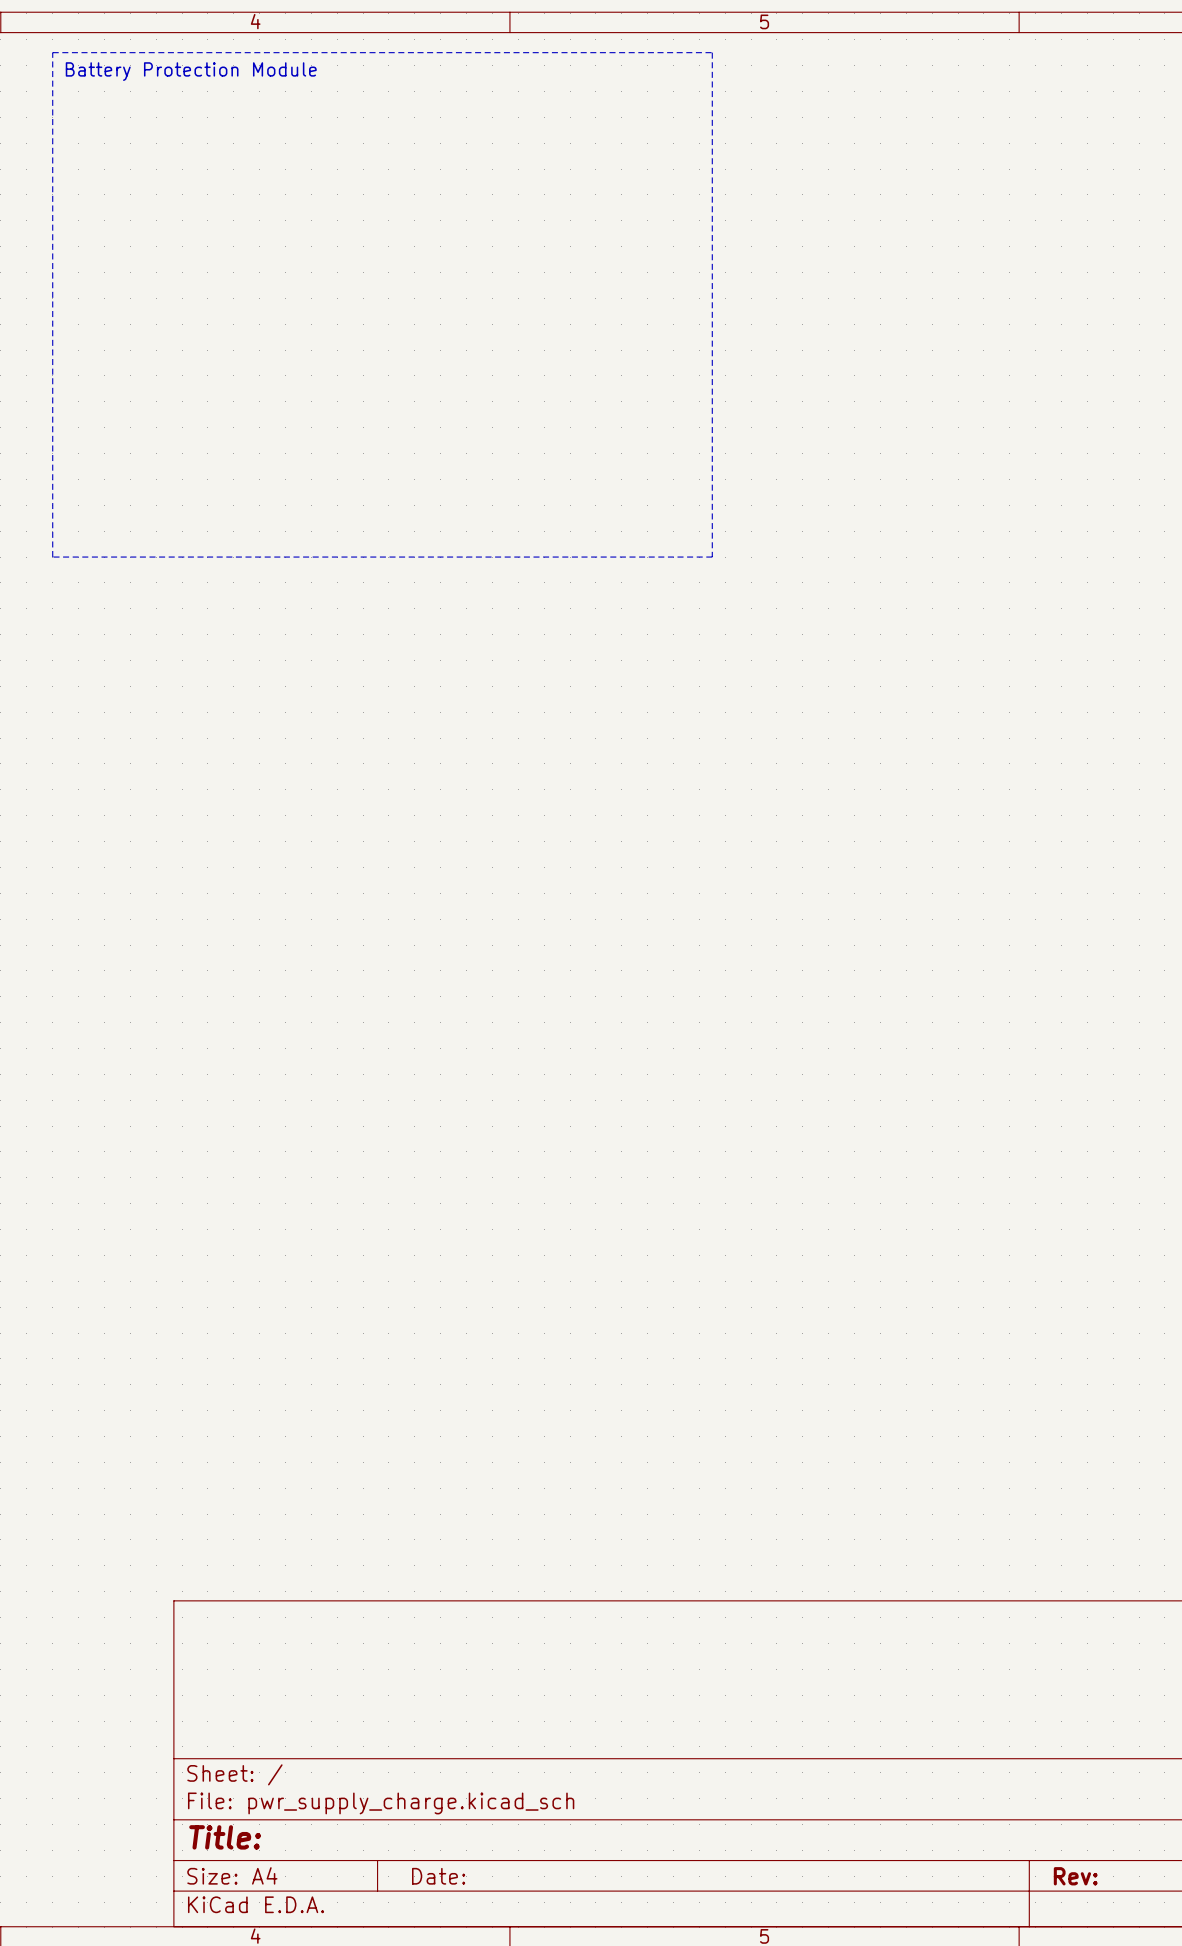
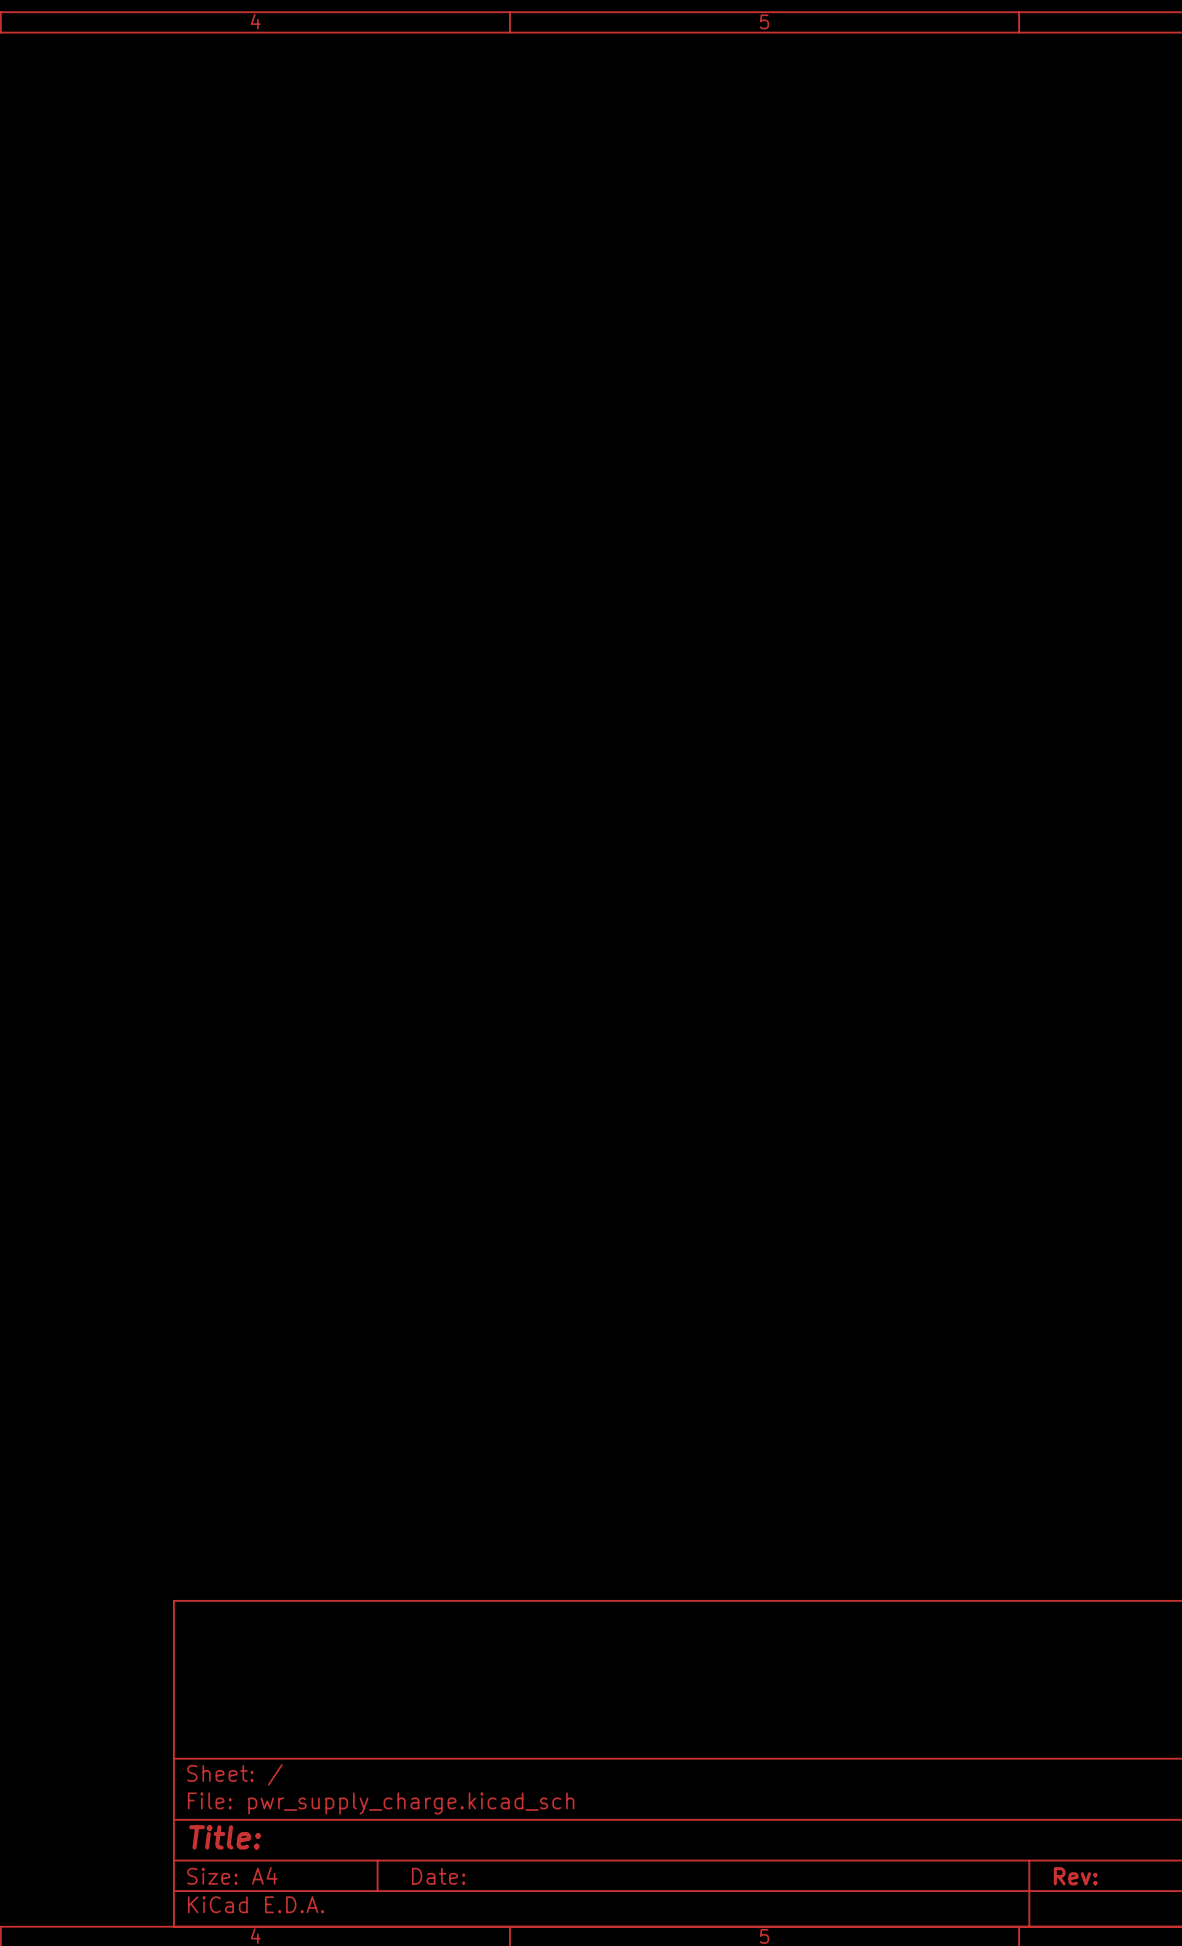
line: (52, 52) (712, 52) (712, 557) (52, 557) (52, 52) -> none
text: Battery Protection Module (191, 71) -> none

